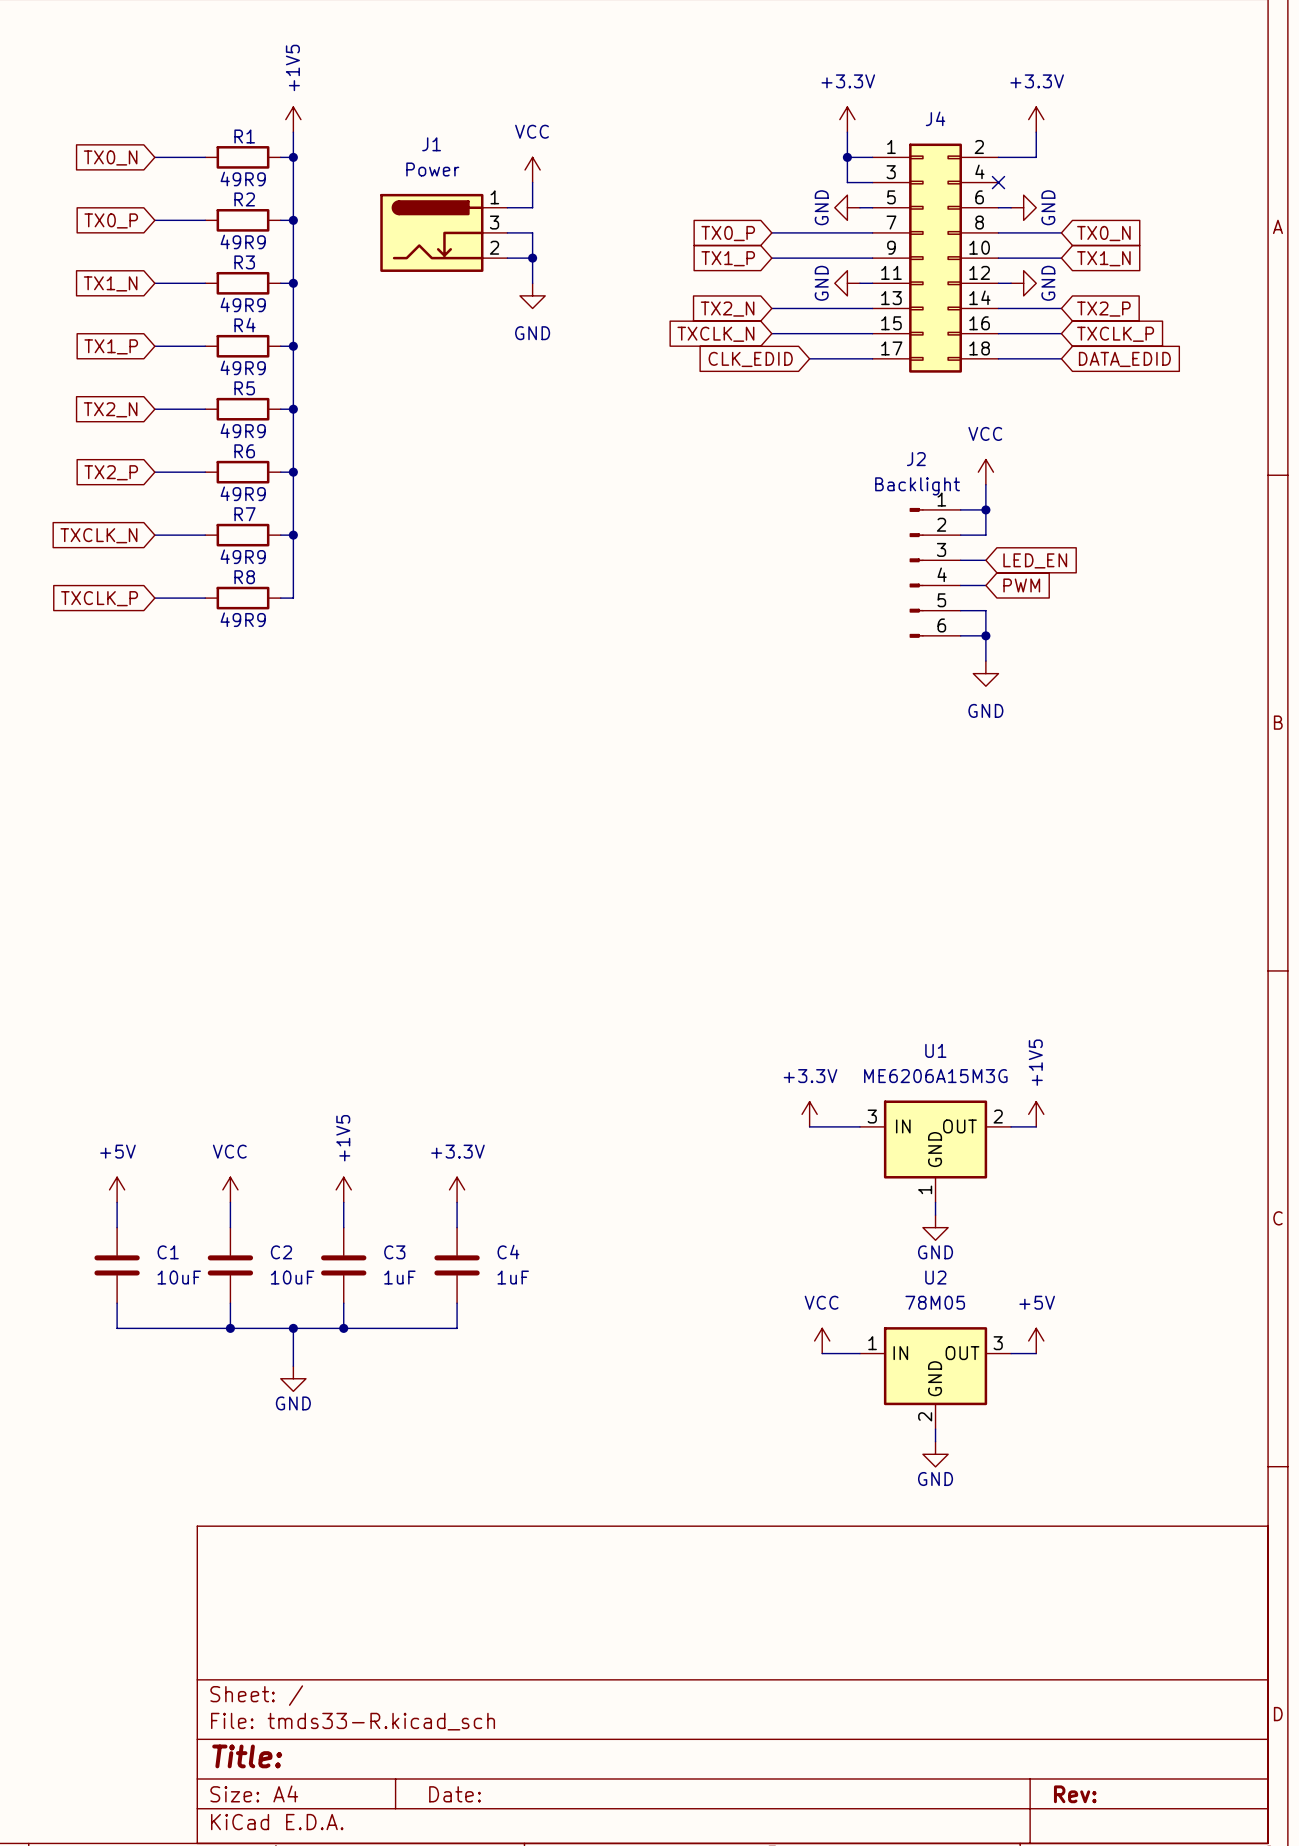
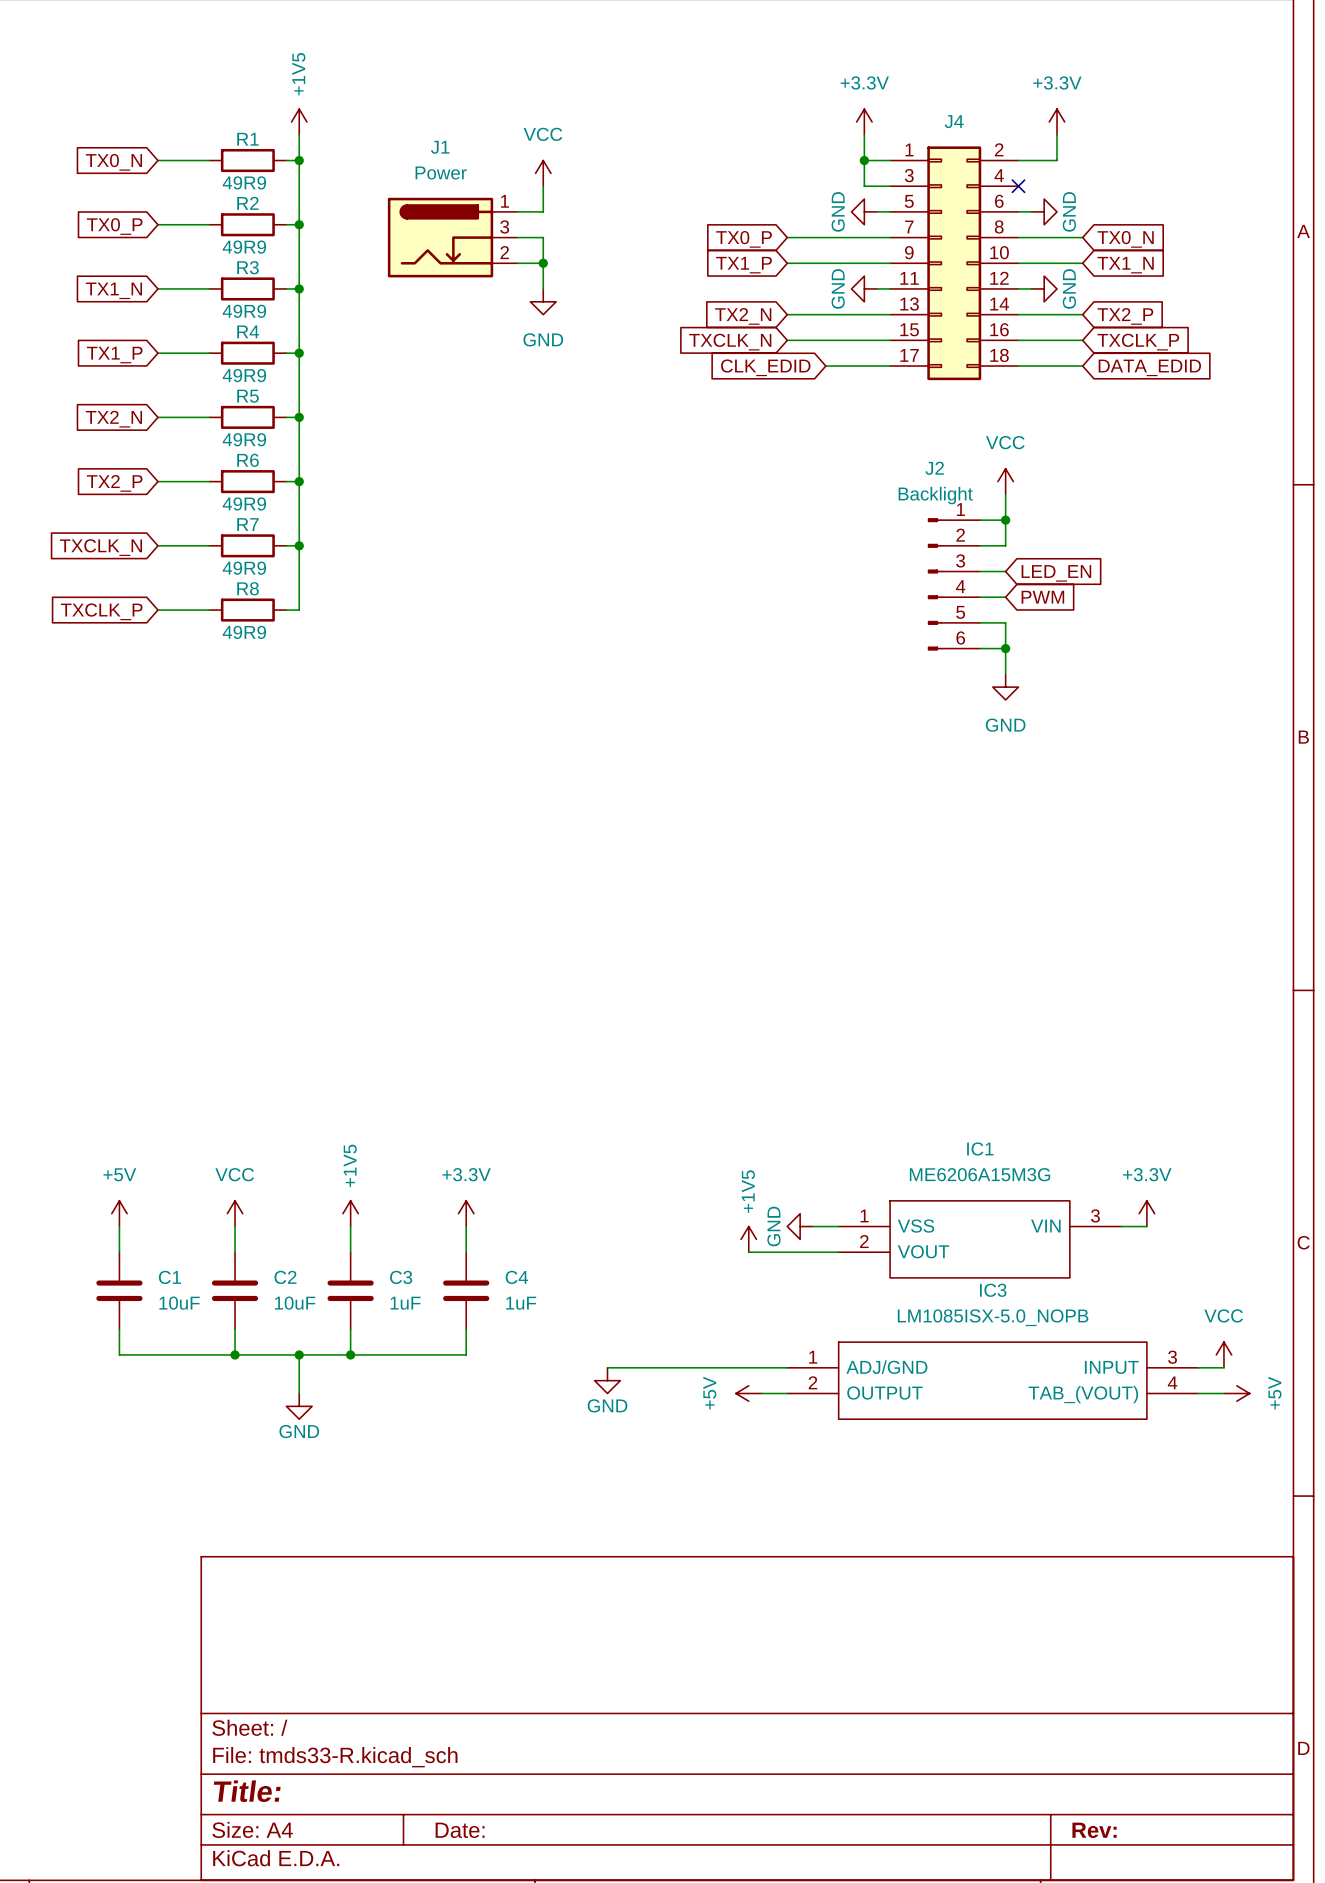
power symbol: +3.3V (809, 1114) -> none
power symbol: +1V5 (1036, 1114) -> none
wire: (809, 1126) (859, 1126) -> none
wire: (1011, 1126) (1036, 1126) -> (1121, 1226) (1146, 1226)
U1: ME6206A15M3G (935, 1151) -> none
power symbol: none -> +3.3V (1146, 1213)
power symbol: none -> GND (800, 1226)
wire: none -> (812, 1226) (838, 1226)
wire: (935, 1202) (935, 1215) -> none
power symbol: none -> +1V5 (748, 1239)
IC1: none -> ME6206A15M3G (979, 1239)
wire: none -> (748, 1252) (838, 1252)
power symbol: GND (935, 1227) -> none
power symbol: none -> VCC (1223, 1354)
wire: none -> (607, 1367) (787, 1367)
power symbol: VCC (822, 1340) -> none
power symbol: +5V (1036, 1340) -> none
power symbol: none -> GND (607, 1380)
wire: (822, 1353) (859, 1353) -> none
IC3: none -> LM1085ISX-5.0_NOPB (992, 1380)
wire: (1011, 1353) (1036, 1353) -> (1198, 1367) (1223, 1367)
power symbol: none -> +5V (748, 1393)
wire: none -> (761, 1393) (787, 1393)
wire: none -> (1198, 1393) (1223, 1393)
power symbol: none -> +5V (1236, 1393)
U2: 78M05 (935, 1378) -> none
wire: (935, 1429) (935, 1441) -> none
power symbol: GND (935, 1454) -> none

